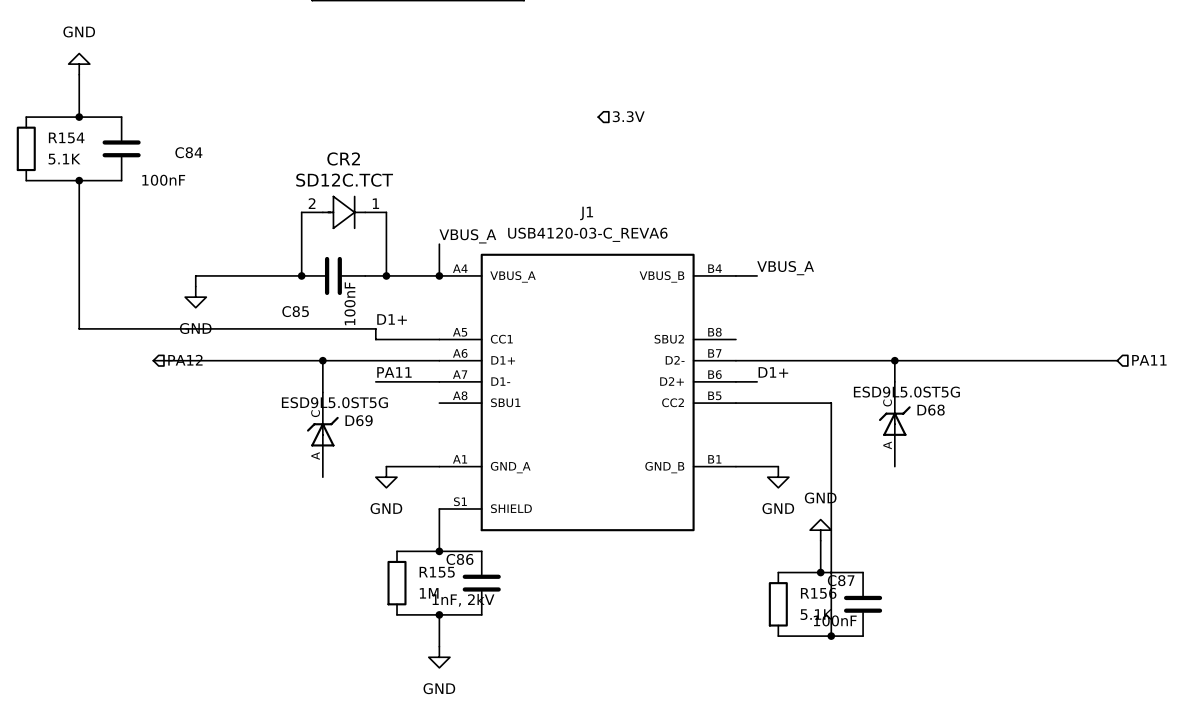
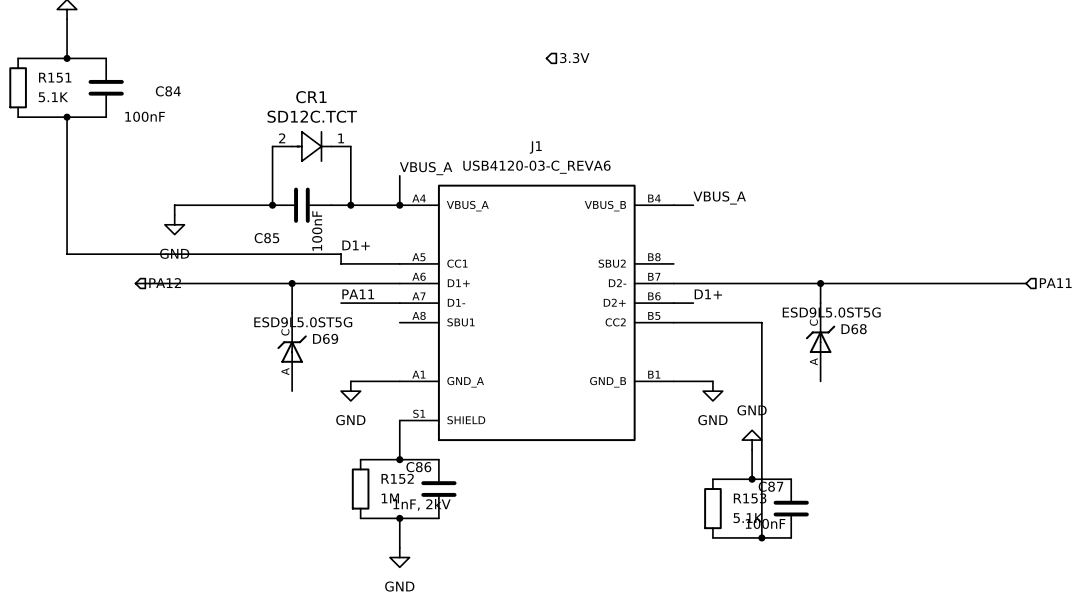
R154 name: R154 (66, 137) -> R151 (55, 77)
CR2 name: CR2 (343, 158) -> CR1 (311, 97)
R155 name: R155 (437, 572) -> R152 (397, 478)
R156 name: R156 (818, 593) -> R153 (750, 498)

